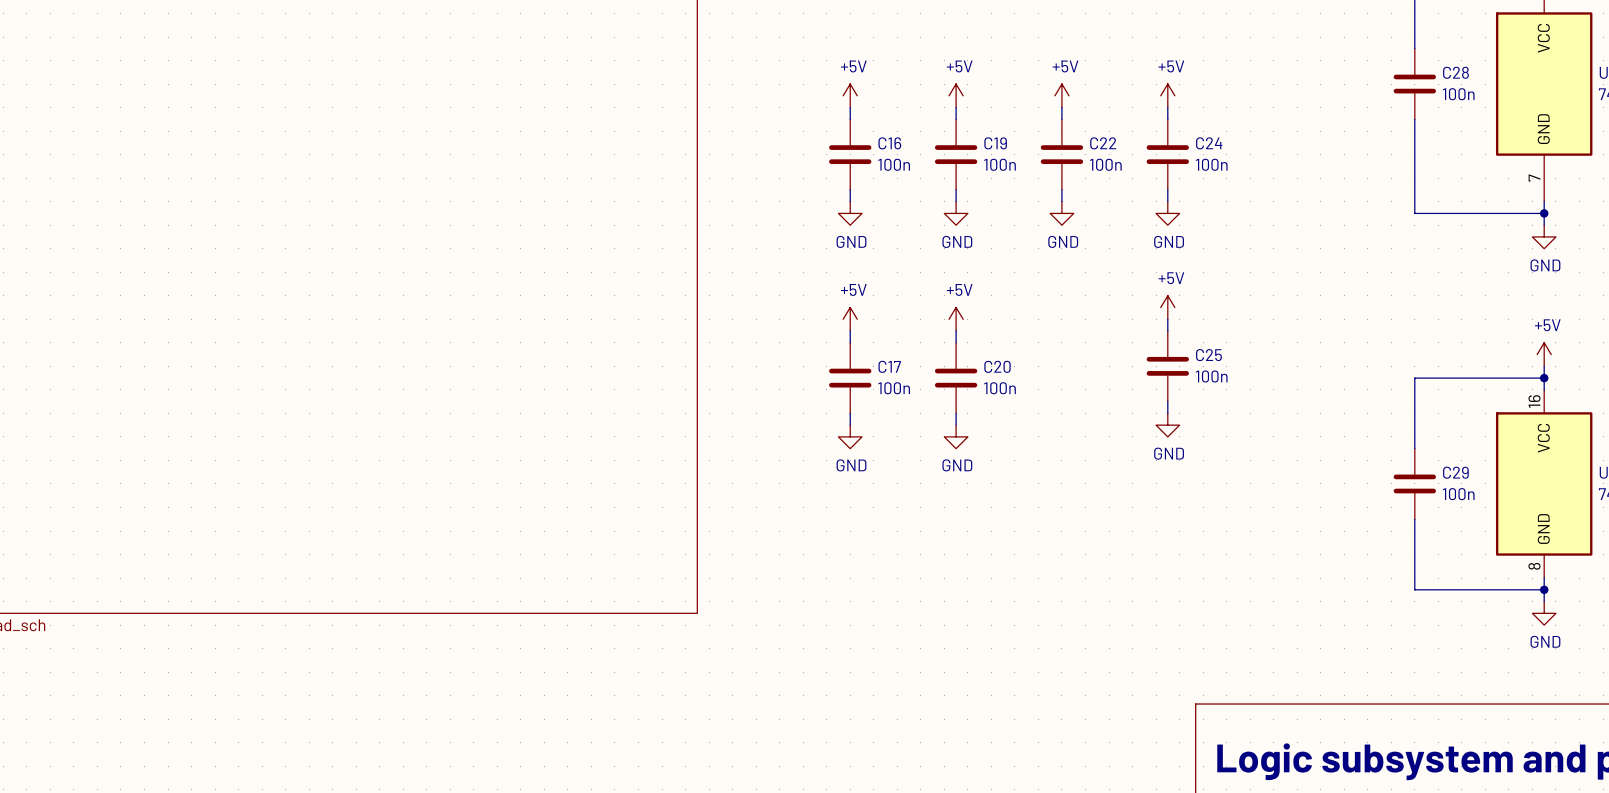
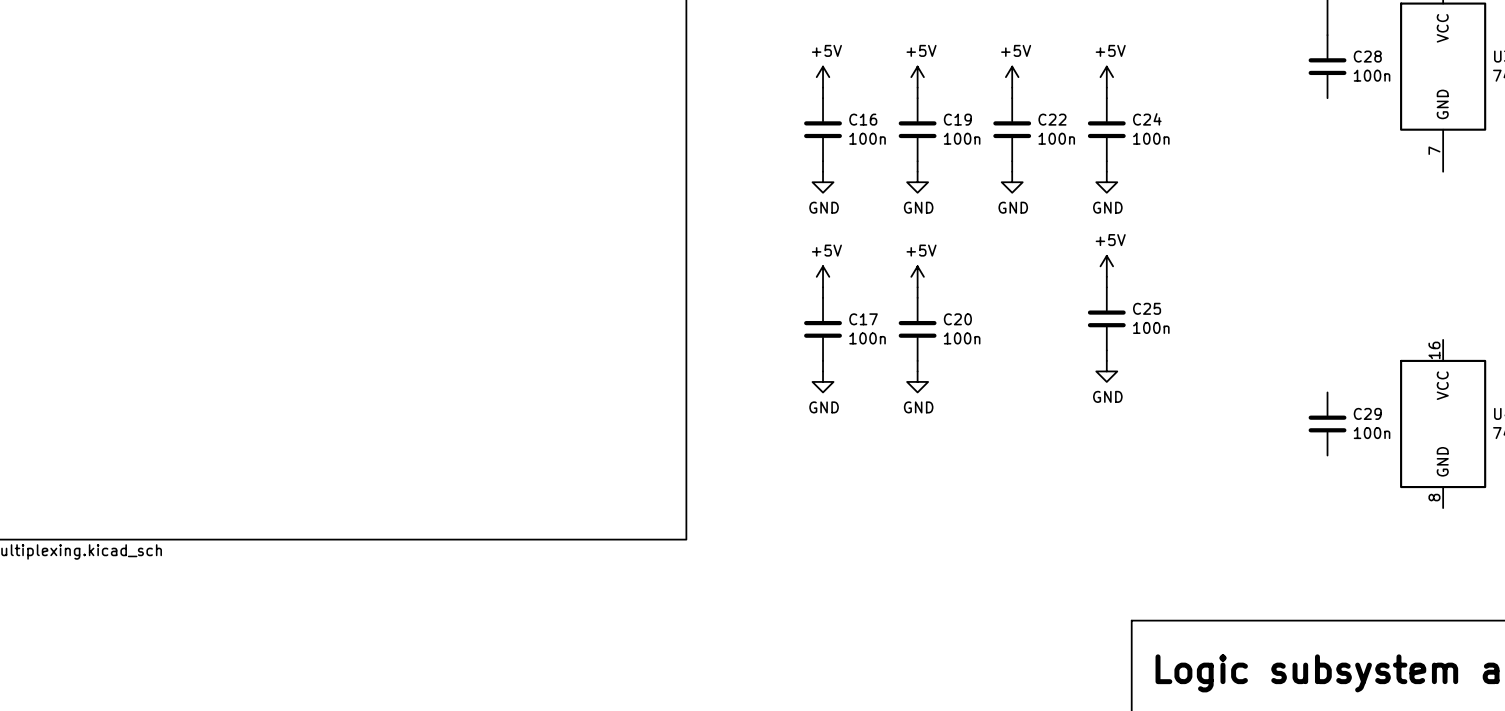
wire: (1414, 119) (1414, 213) (1544, 213) -> none
wire: (1544, 201) (1544, 225) -> none
junction: (1544, 213) -> none
power symbol: GND (1544, 236) -> none
power symbol: +5V (1544, 354) -> none
wire: (1544, 366) (1544, 389) -> none
wire: (1544, 378) (1414, 378) (1414, 448) -> none
junction: (1544, 378) -> none
wire: (1414, 519) (1414, 589) (1544, 589) -> none
wire: (1544, 578) (1544, 601) -> none
junction: (1544, 589) -> none
power symbol: GND (1544, 613) -> none

